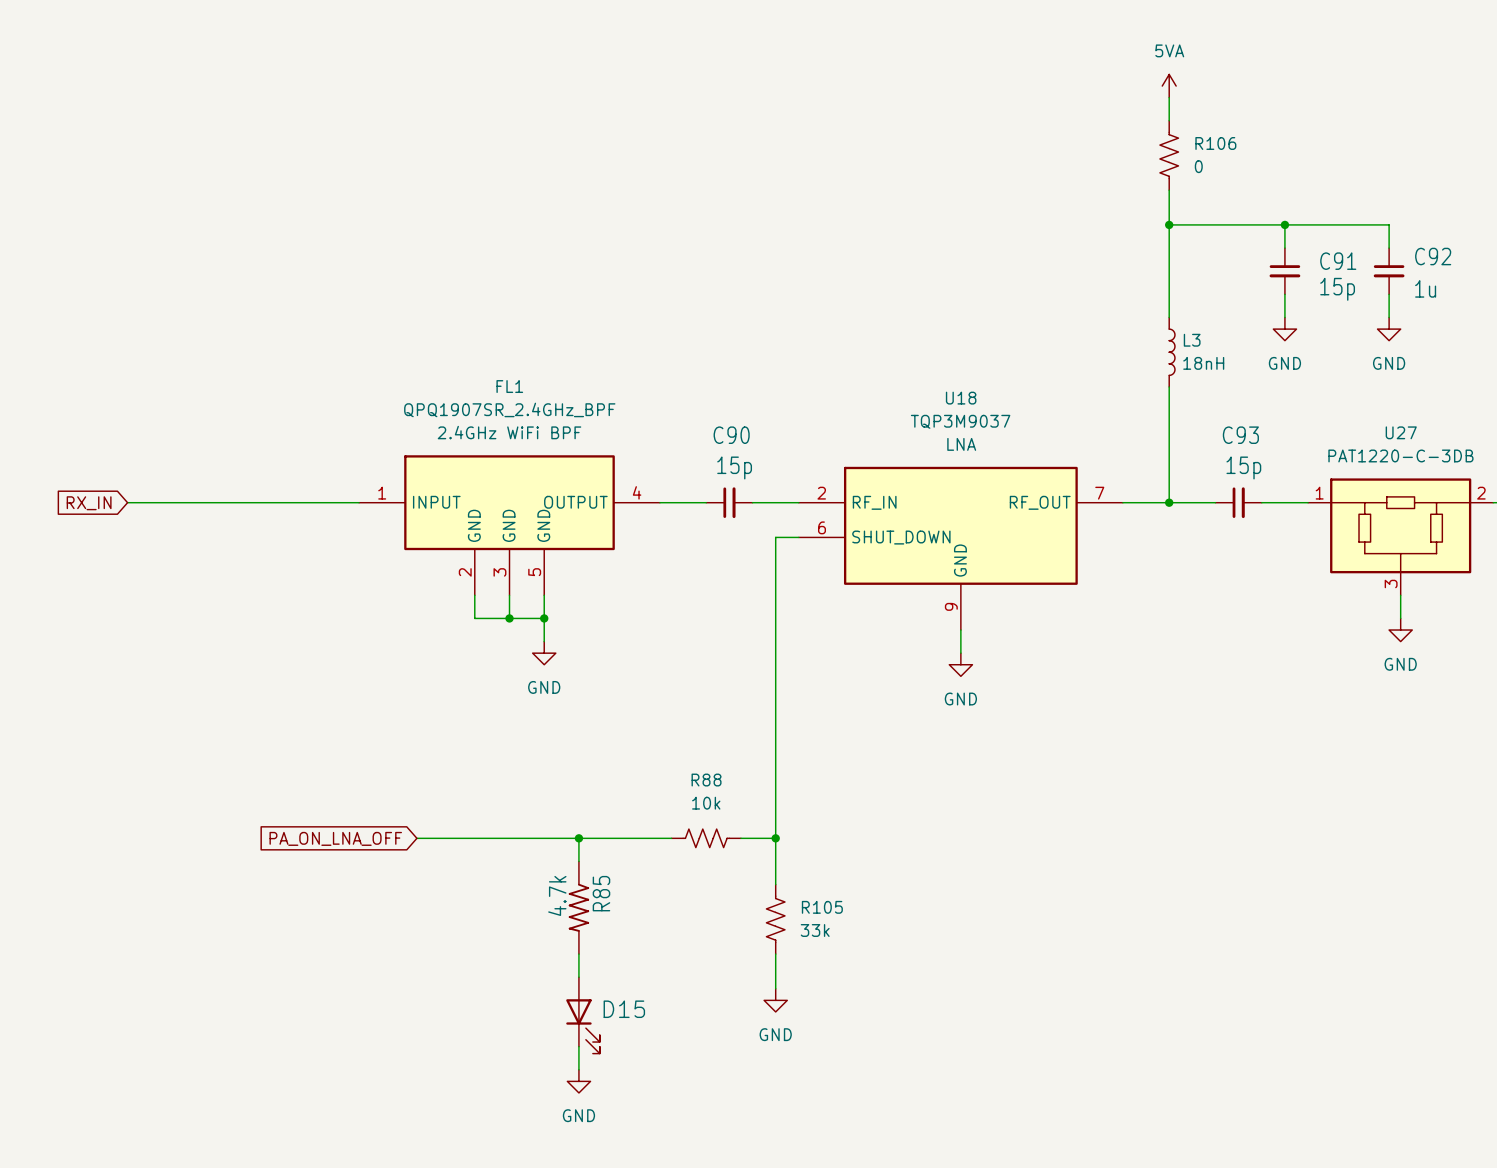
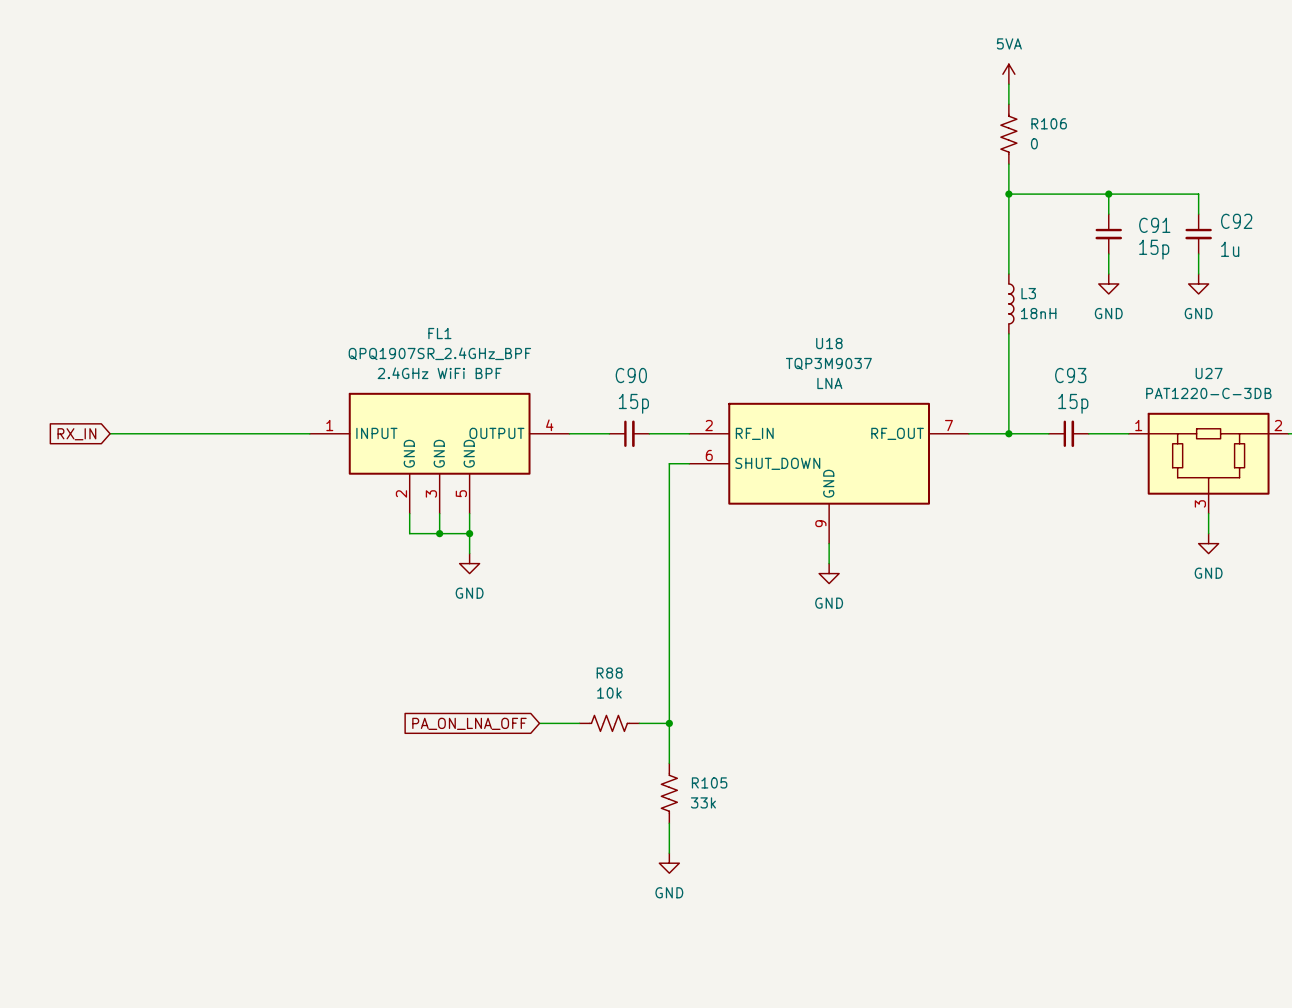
global label position: PA_ON_LNA_OFF (335, 838) -> PA_ON_LNA_OFF (469, 723)
wire: (416, 838) (625, 838) -> none
wire: (578, 838) (578, 861) -> none
junction: (578, 838) -> none
R85: 4.7k (578, 907) -> none
wire: (578, 954) (578, 977) -> none
D15: (583, 1015) -> none
wire: (578, 1046) (578, 1069) -> none
power symbol: GND (578, 1081) -> none

